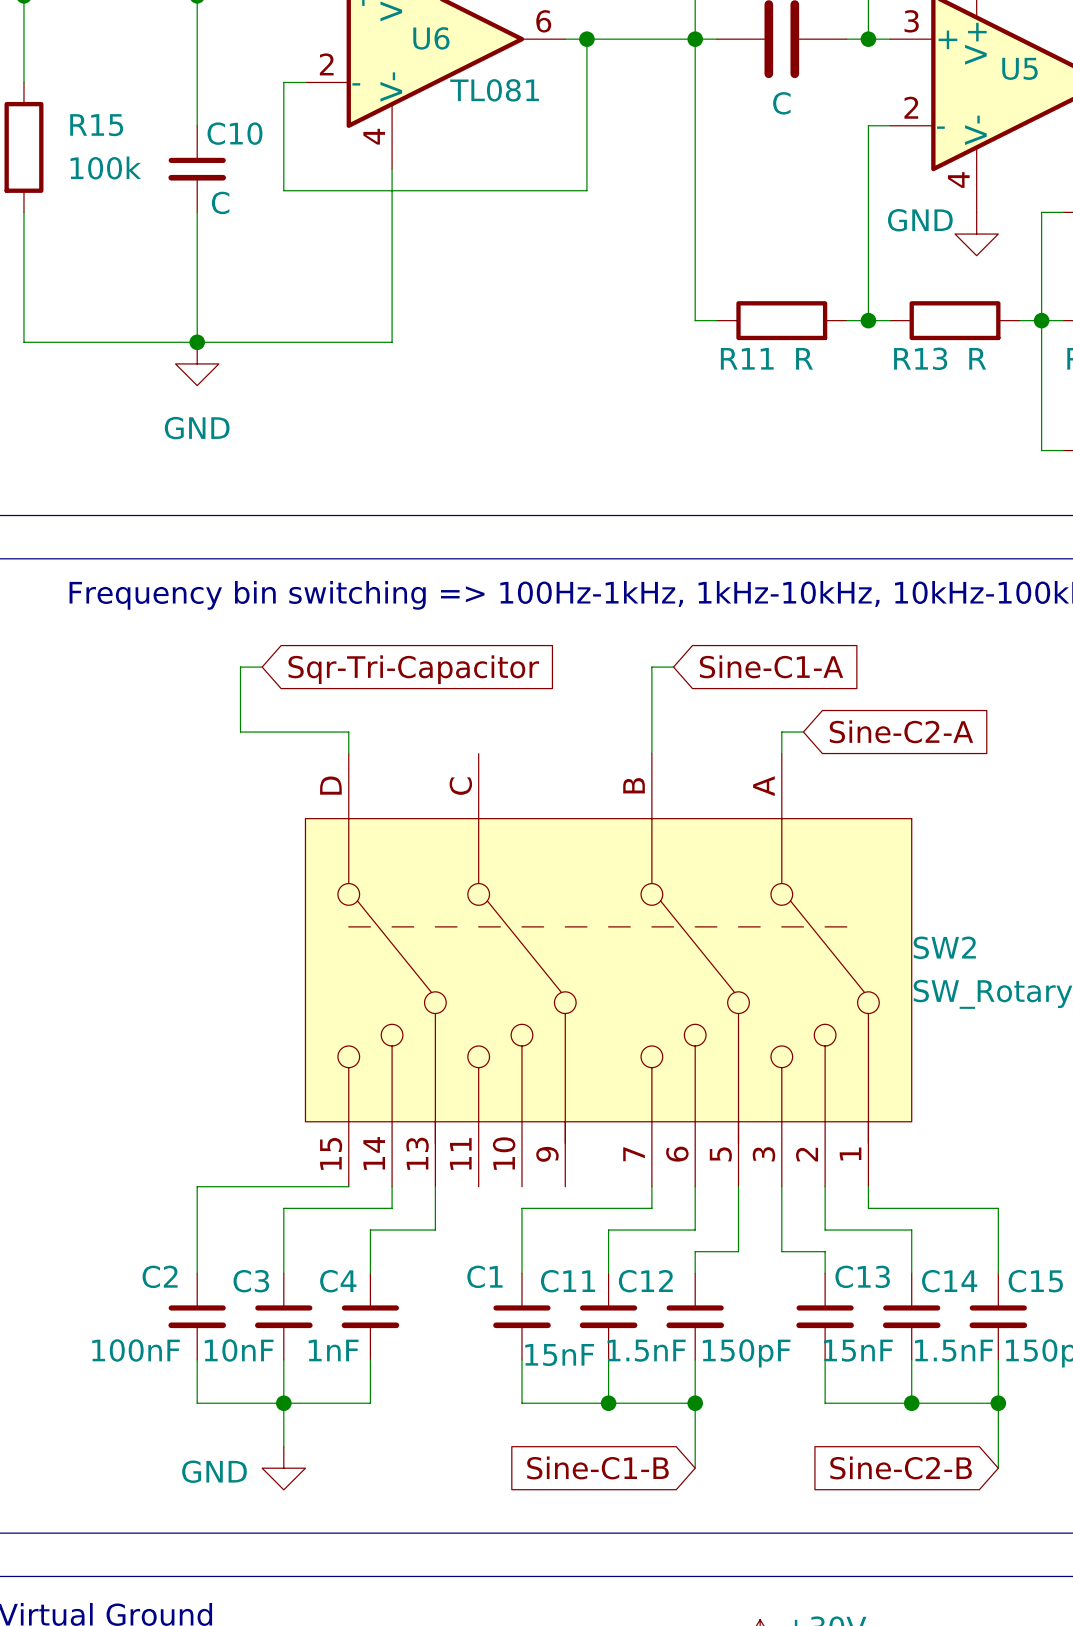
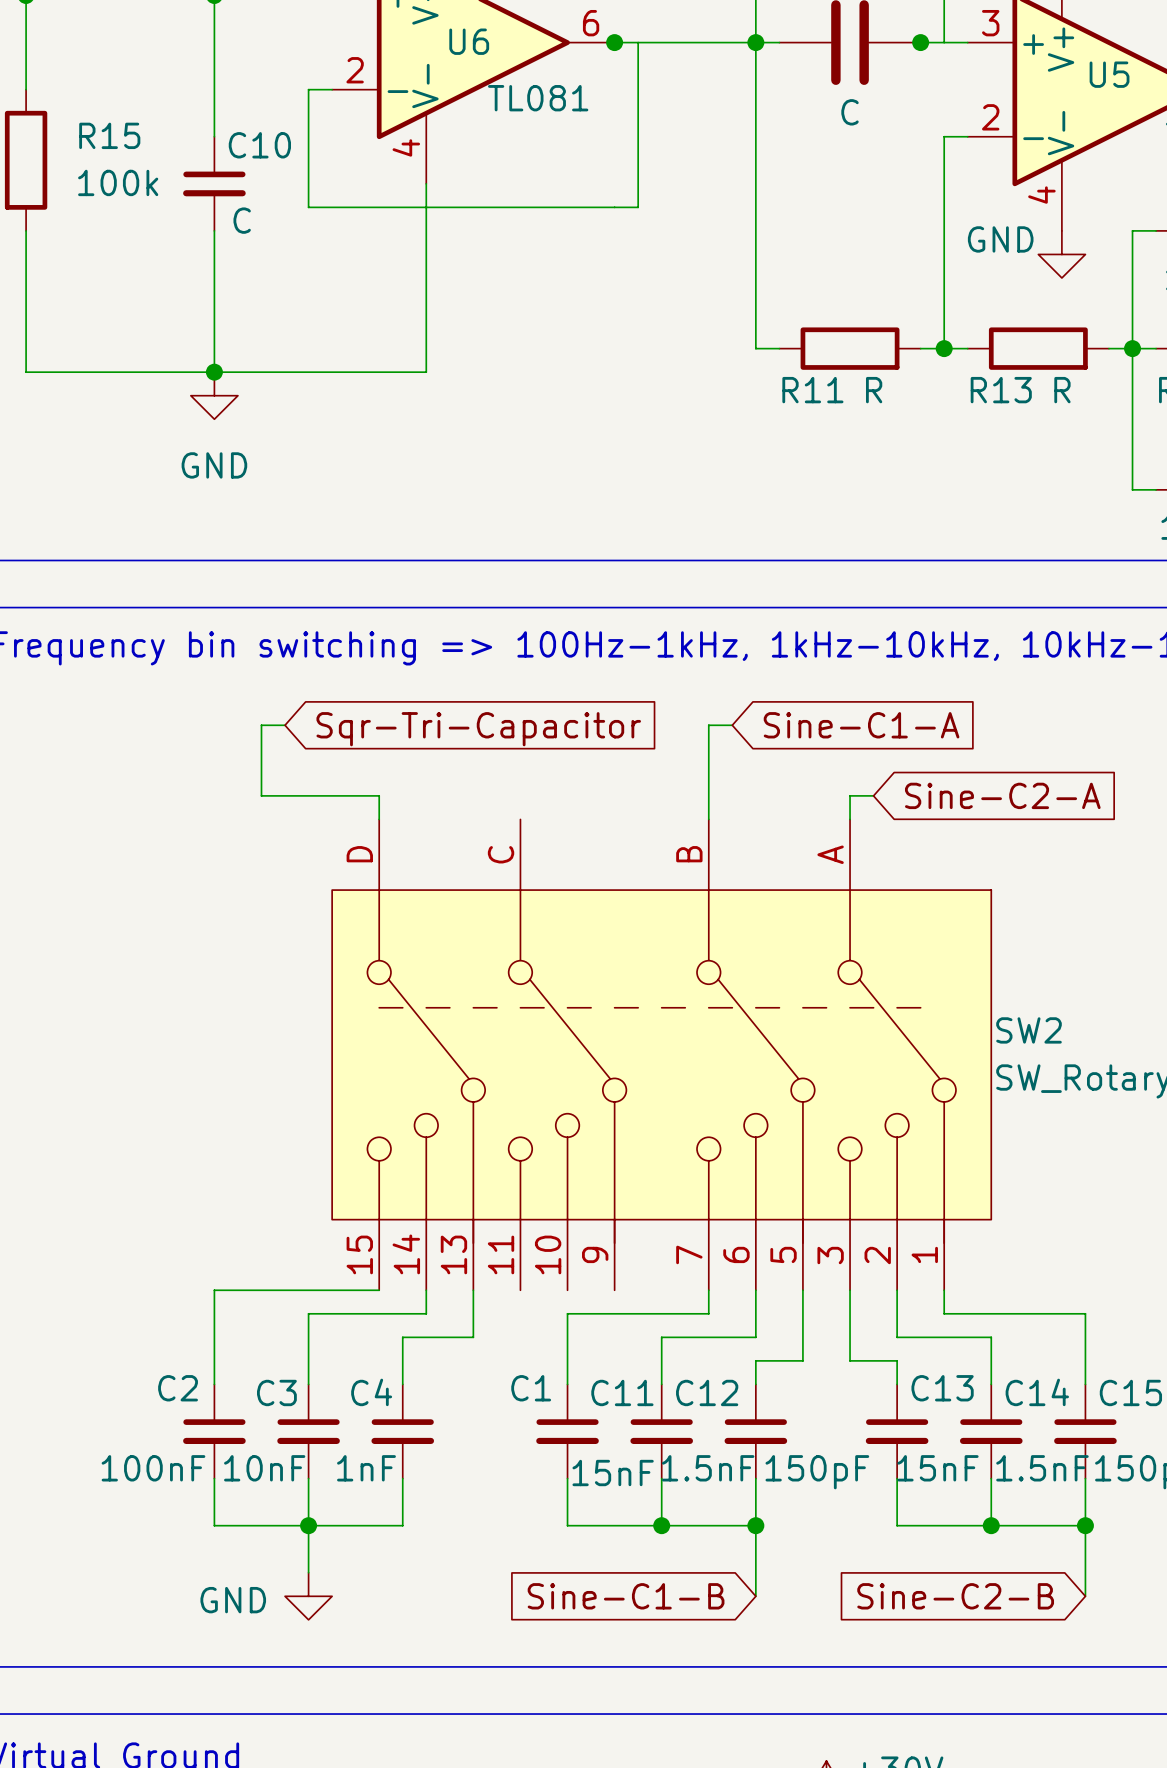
junction position: (586, 39) -> (614, 42)
junction position: (868, 39) -> (920, 42)

